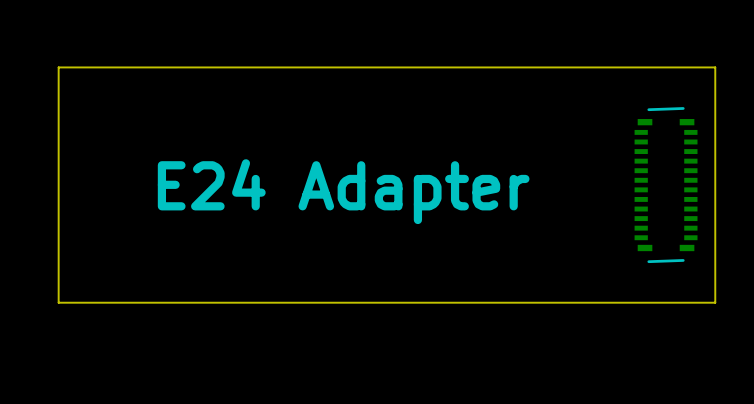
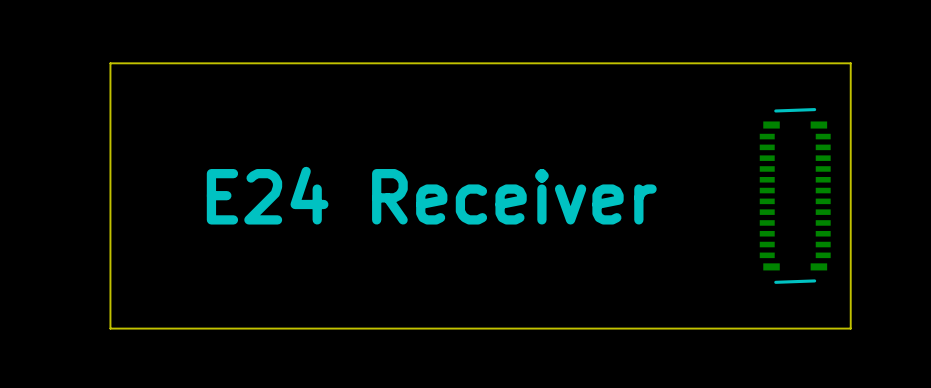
text: E24 Adapter (343, 191) -> E24 Receiver (431, 195)

